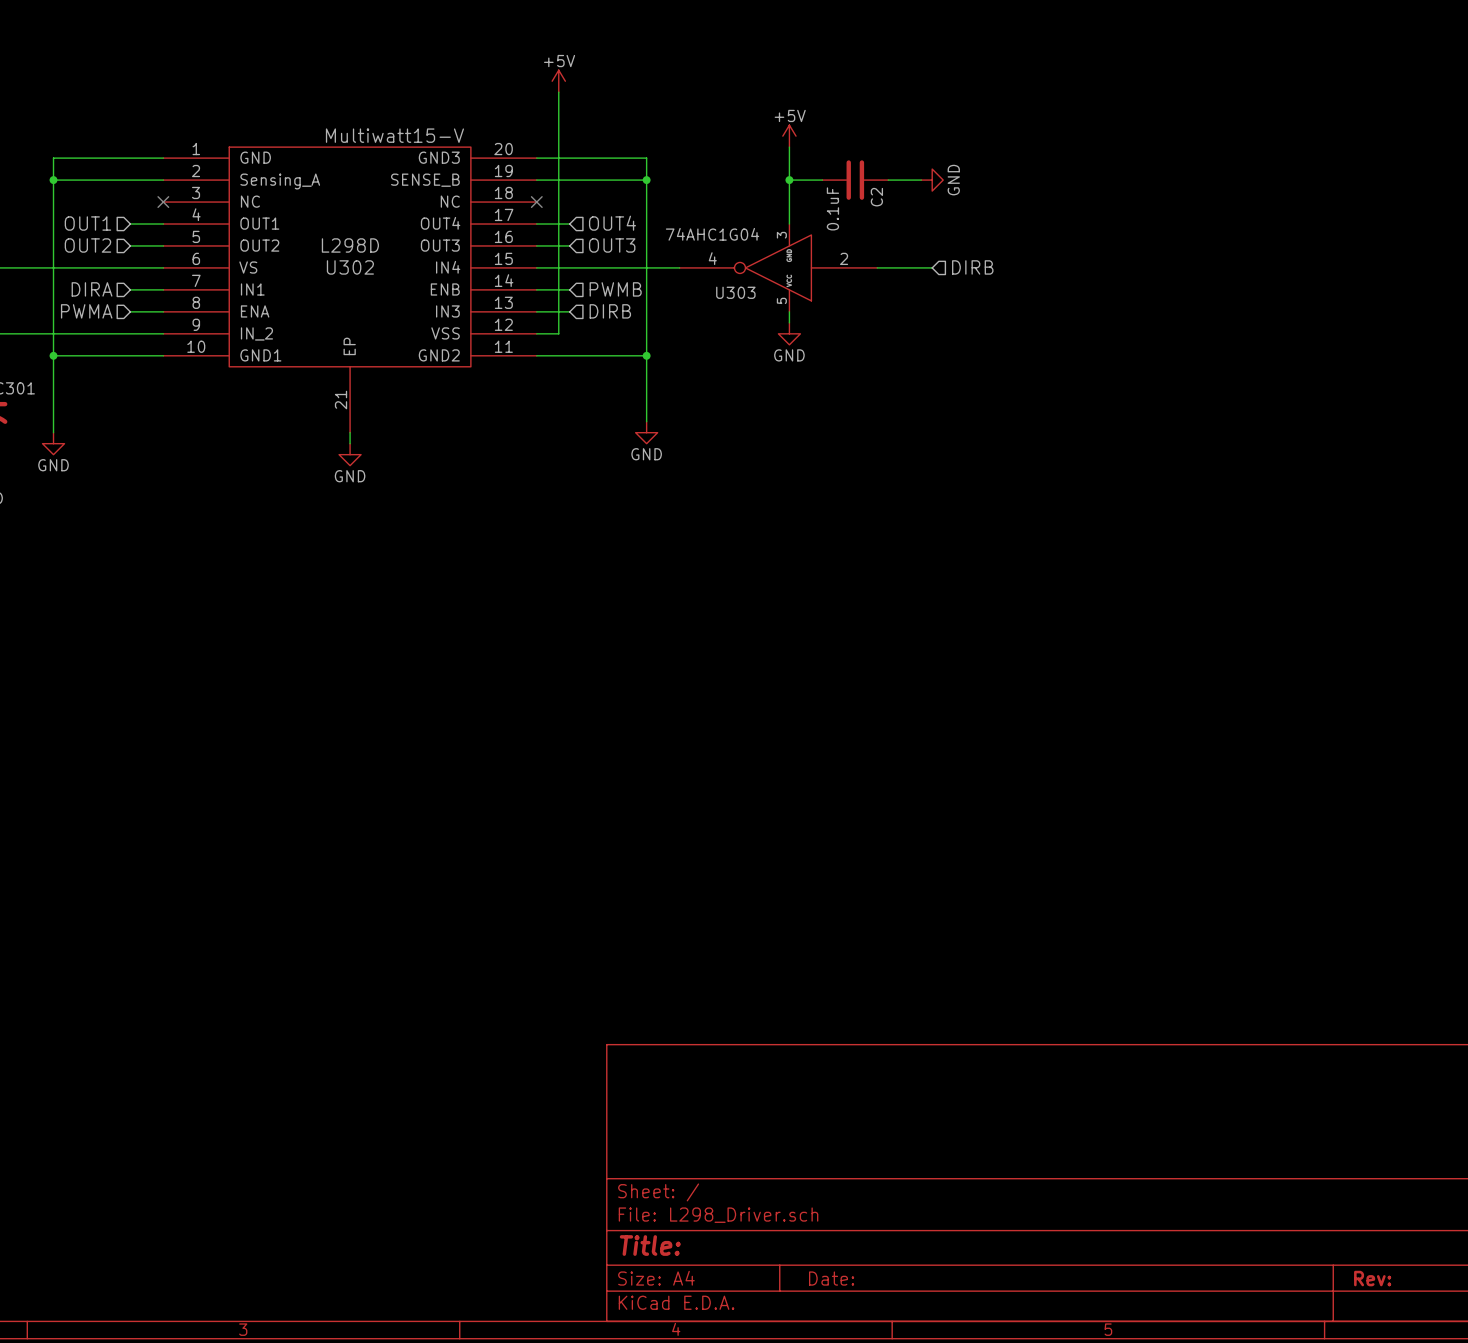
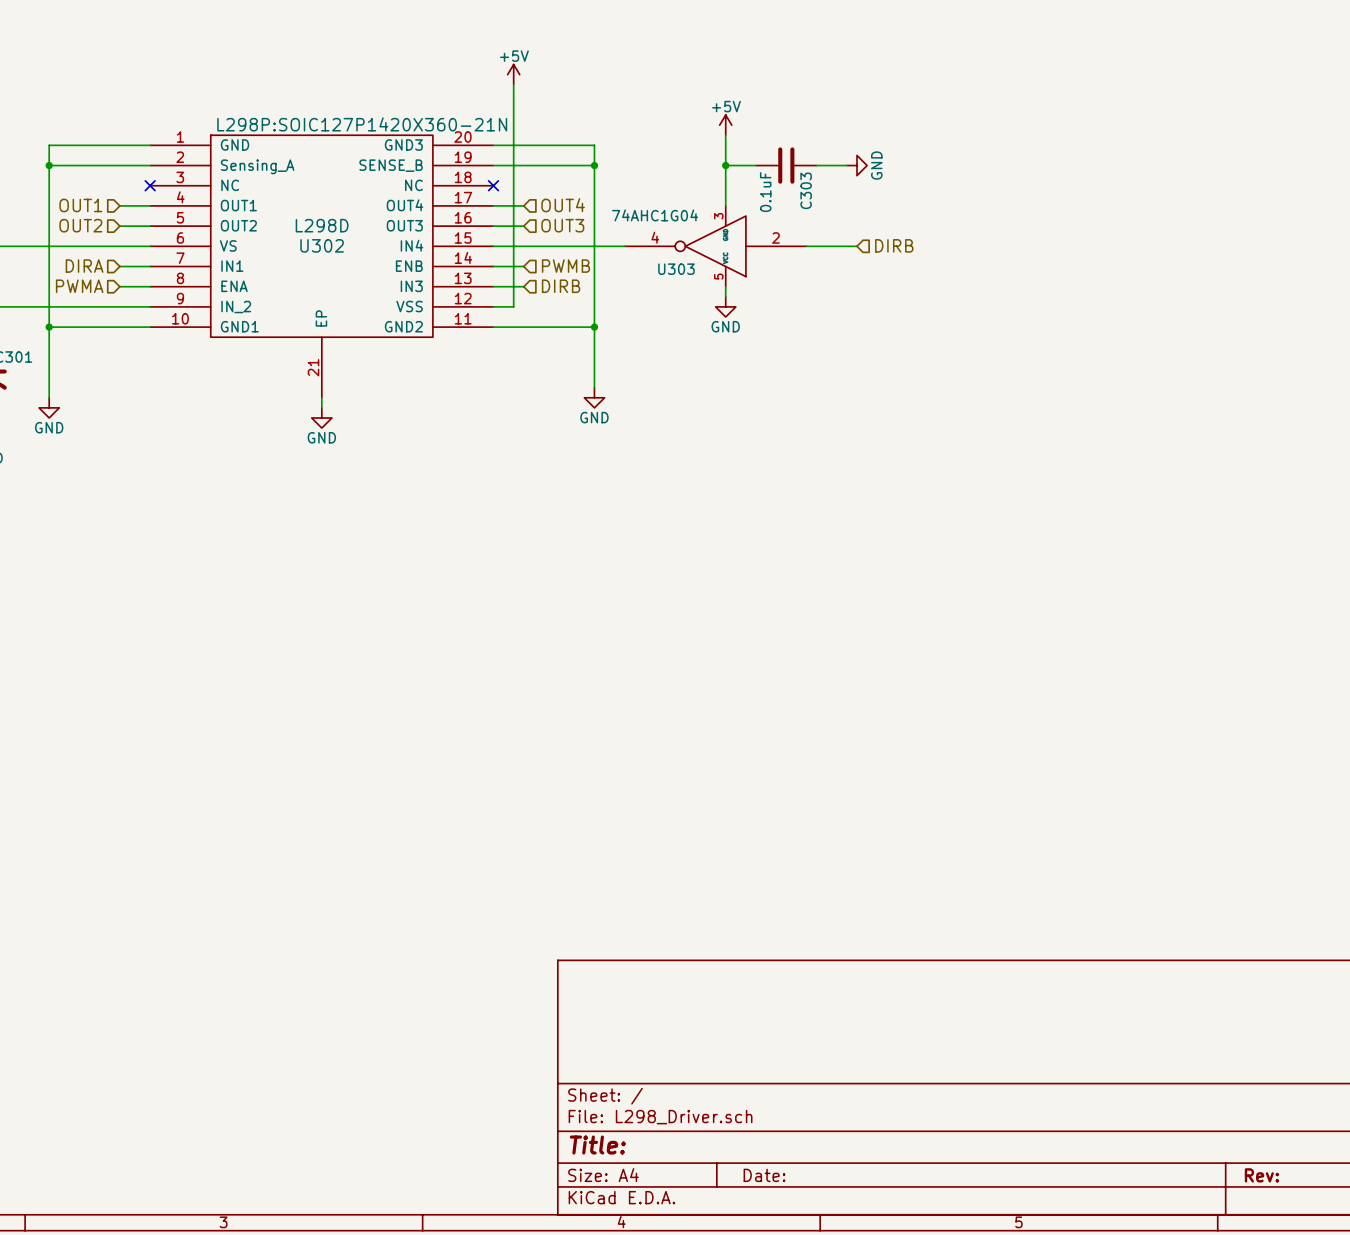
U302 text: Multiwatt15-V (394, 135) -> L298P:SOIC127P1420X360-21N (362, 124)
C2 name: C2 (876, 197) -> C303 (806, 190)

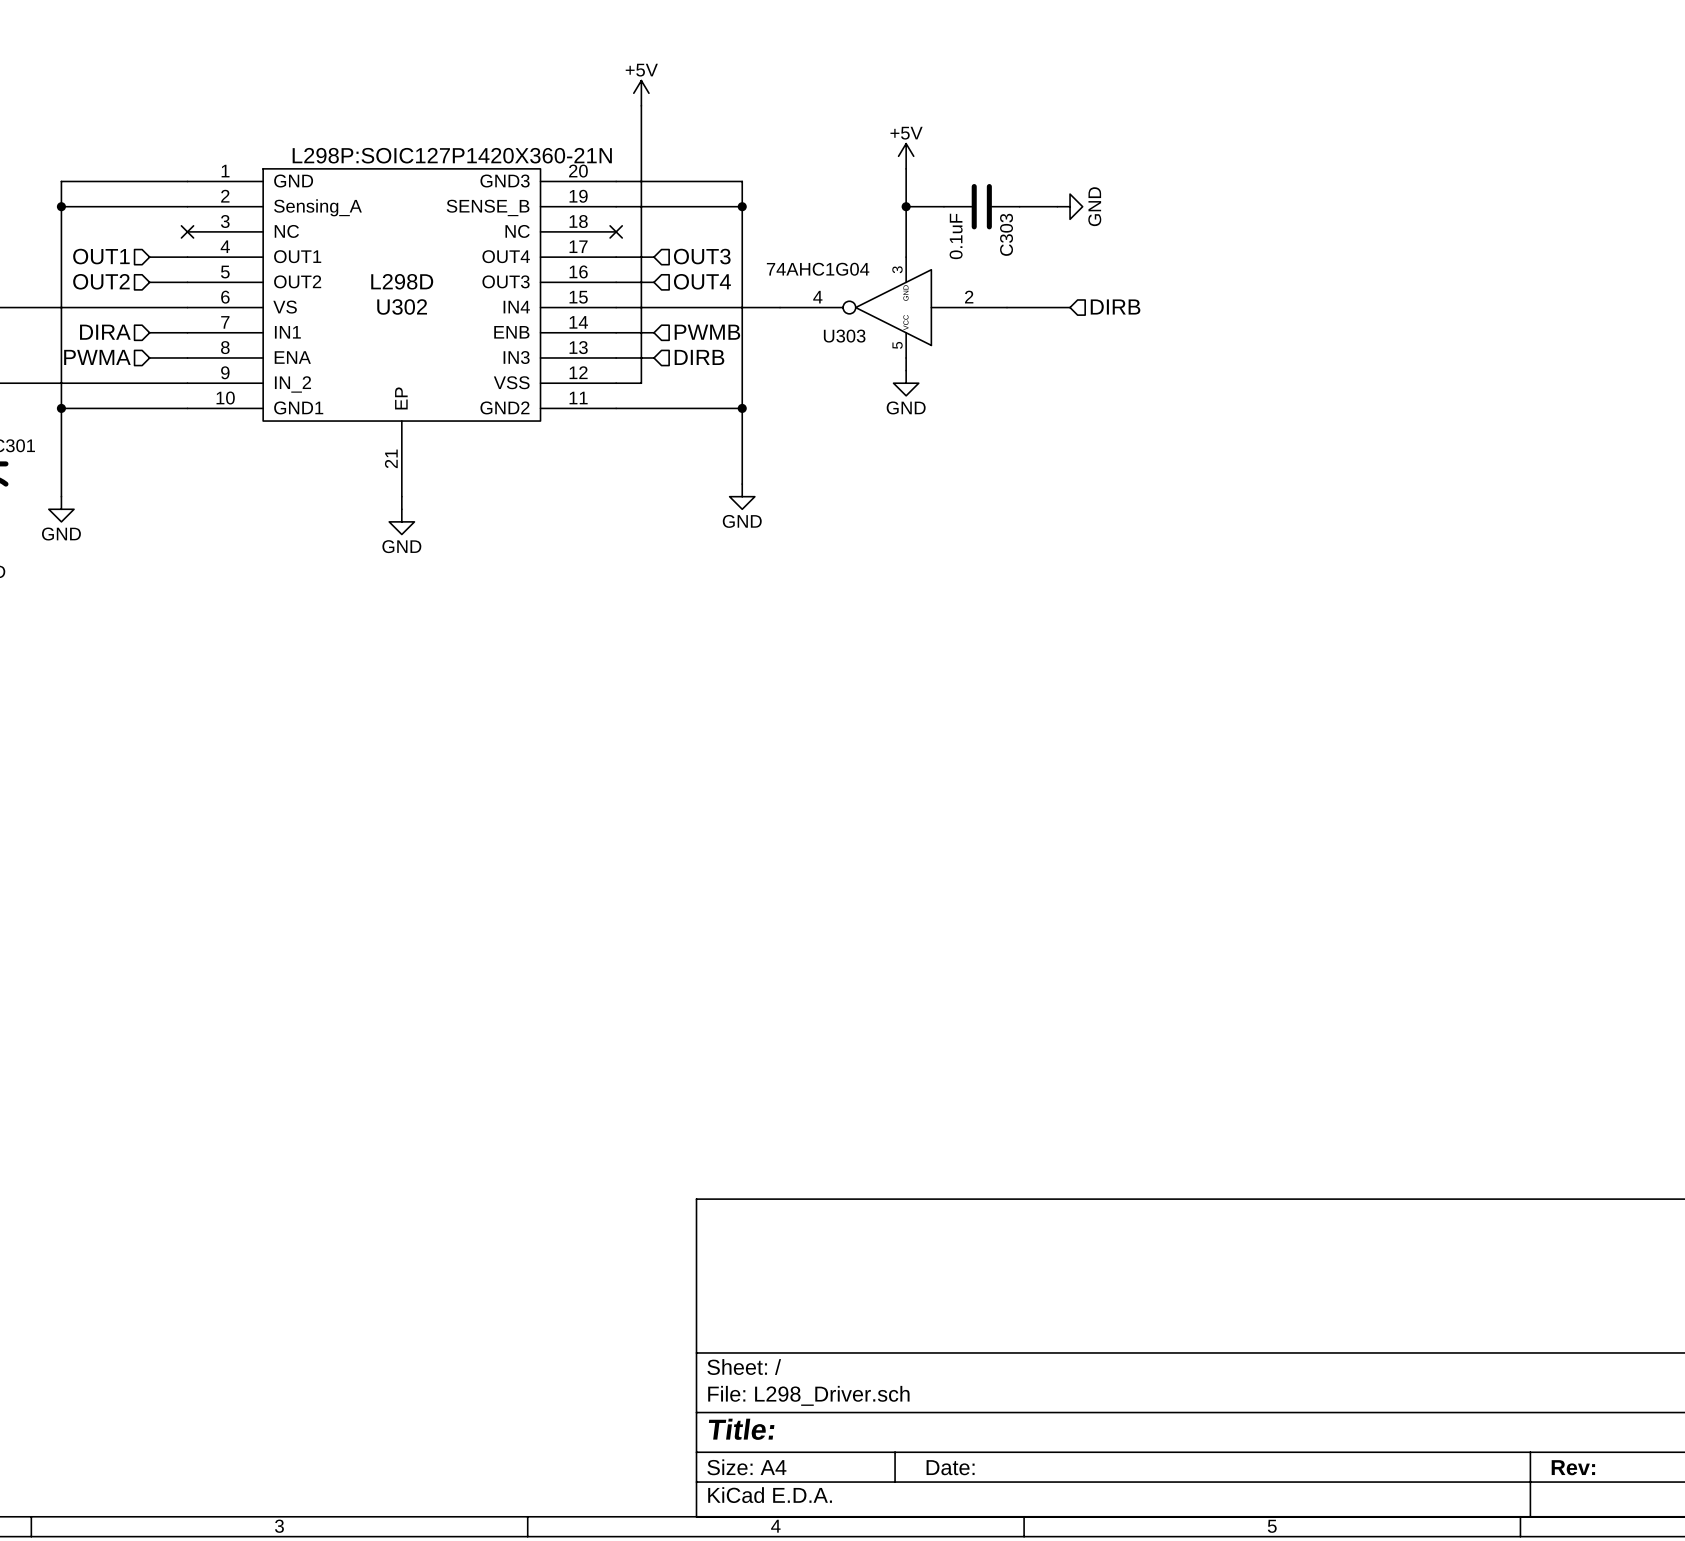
hierarchical label: OUT4 (563, 205) -> OUT3 (702, 256)
hierarchical label: OUT3 (562, 225) -> OUT4 (702, 281)

